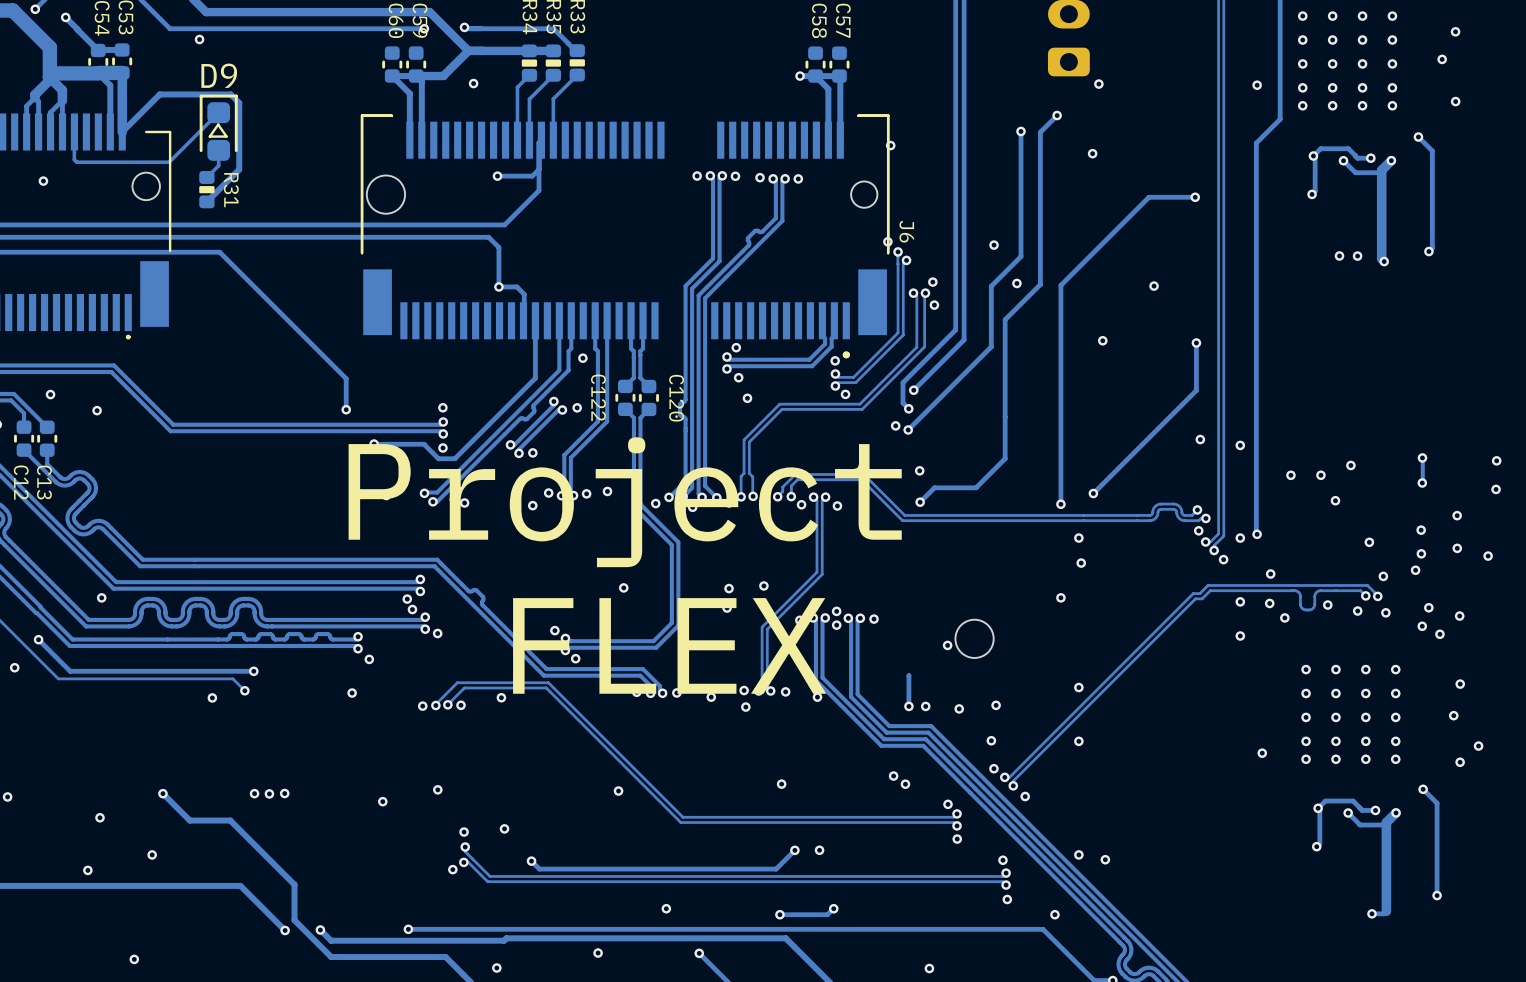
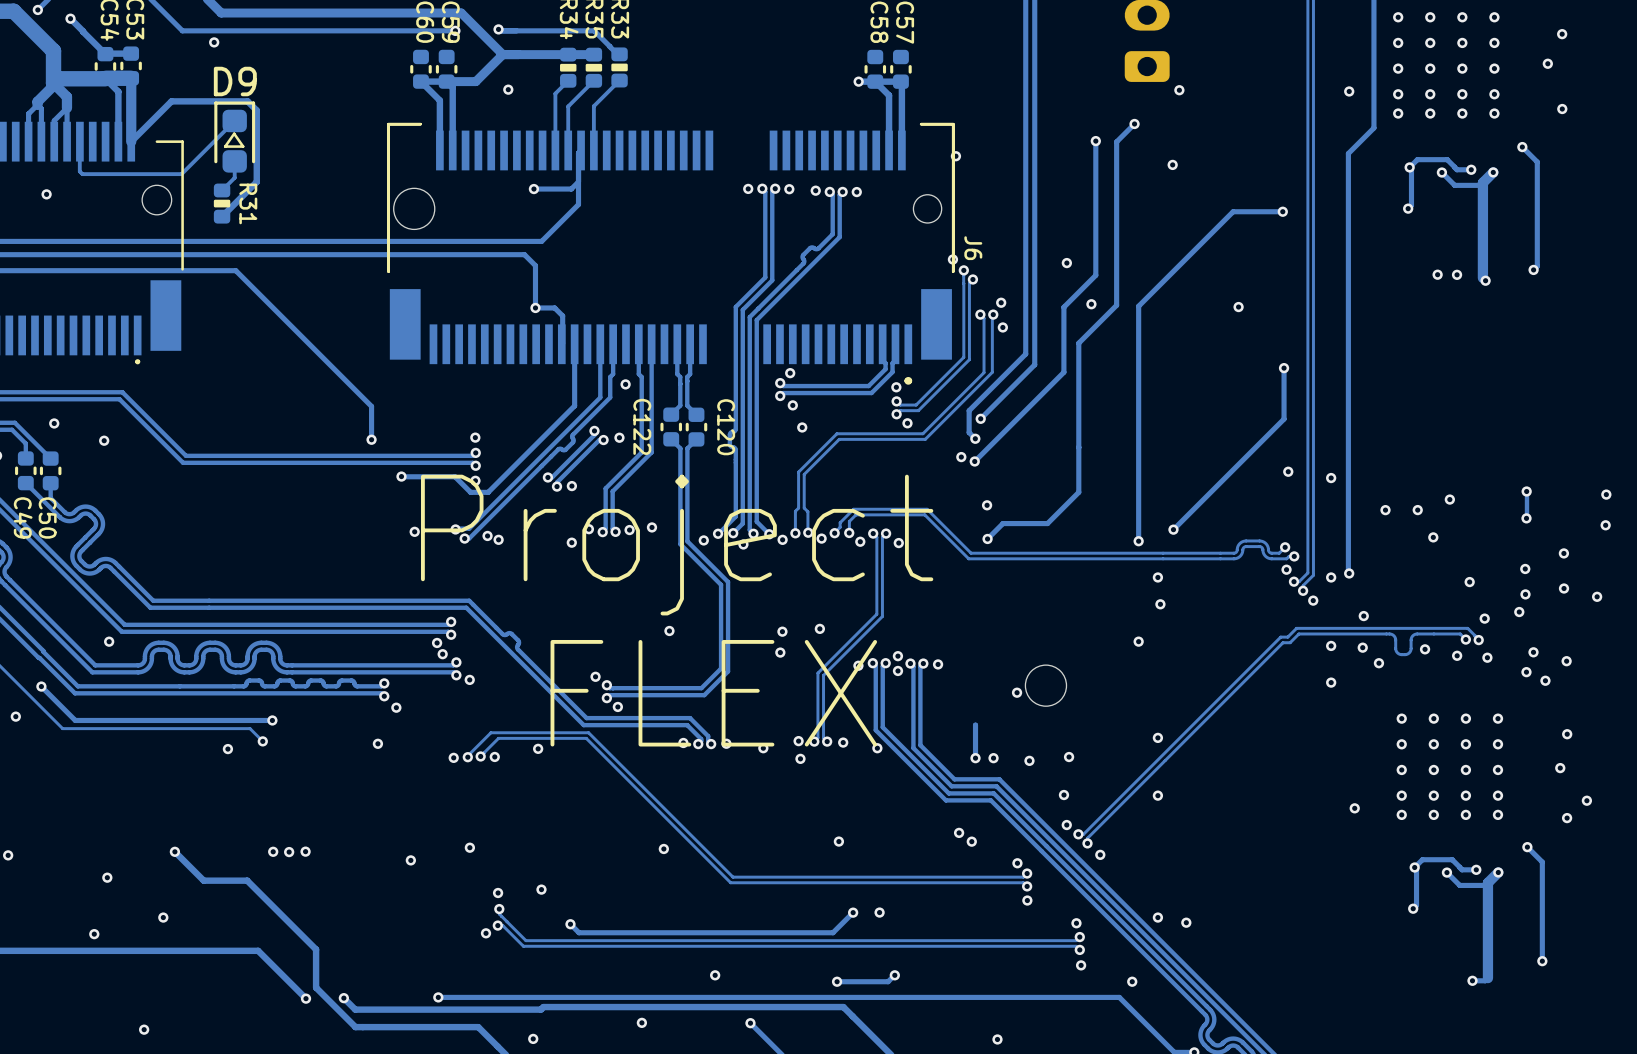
via: (1102, 340) -> none
C12 name: C12 (21, 482) -> C49 (23, 517)
C13 name: C13 (44, 482) -> C50 (47, 517)

